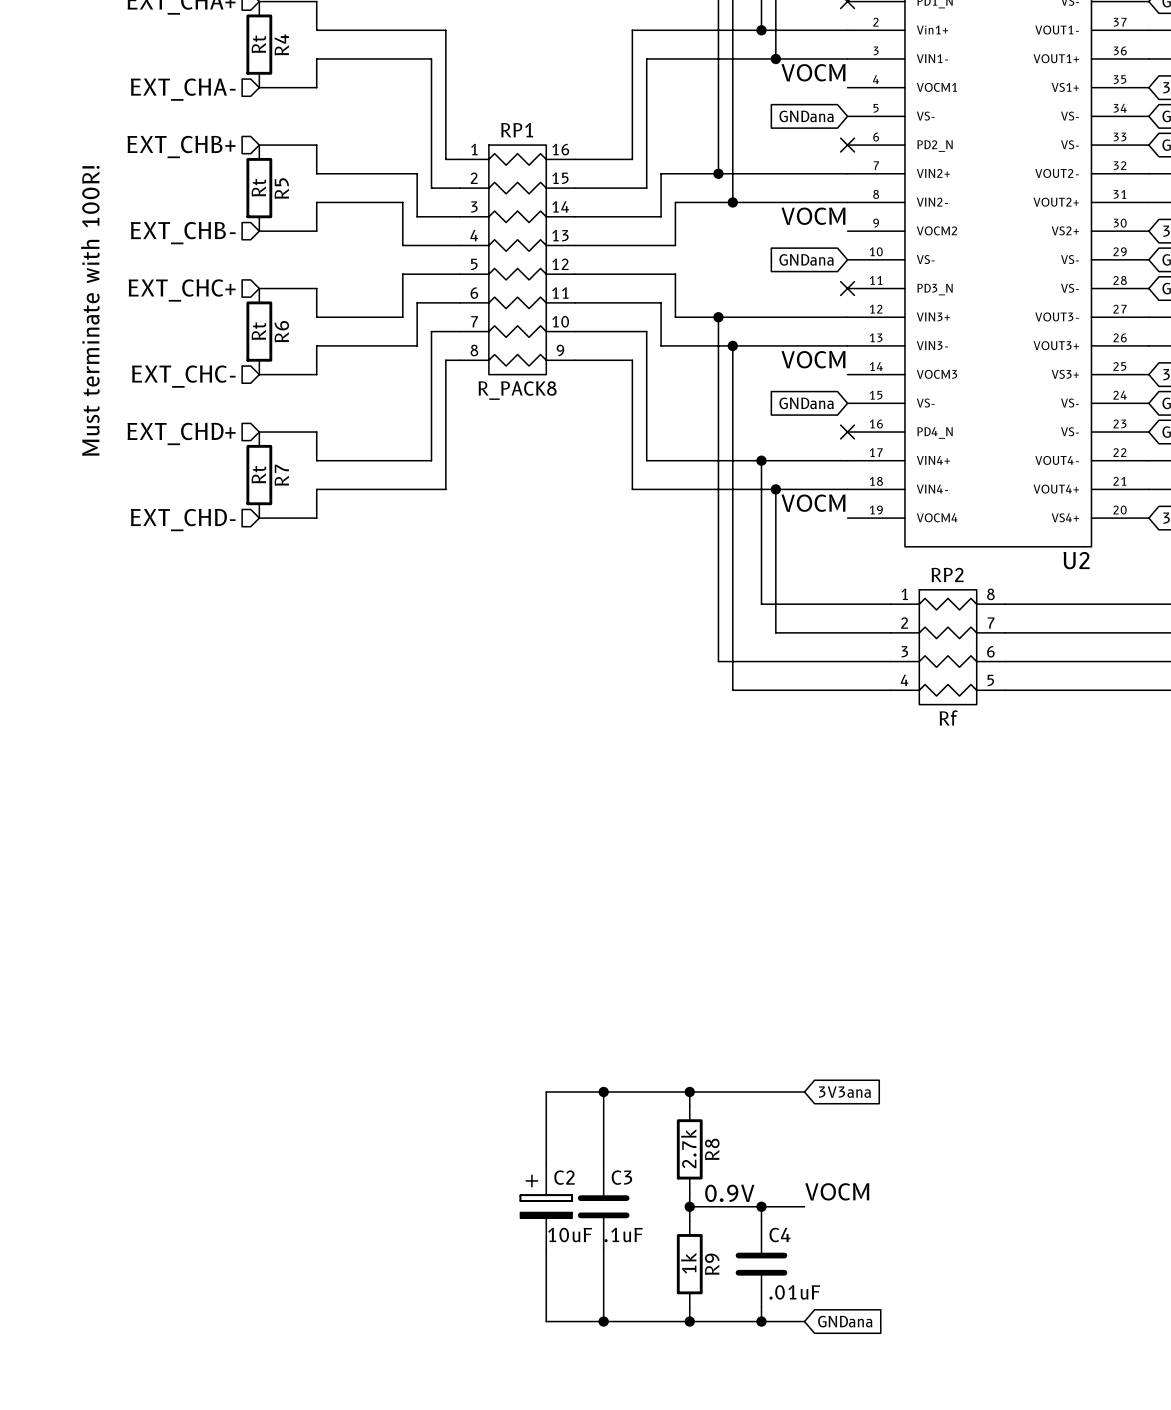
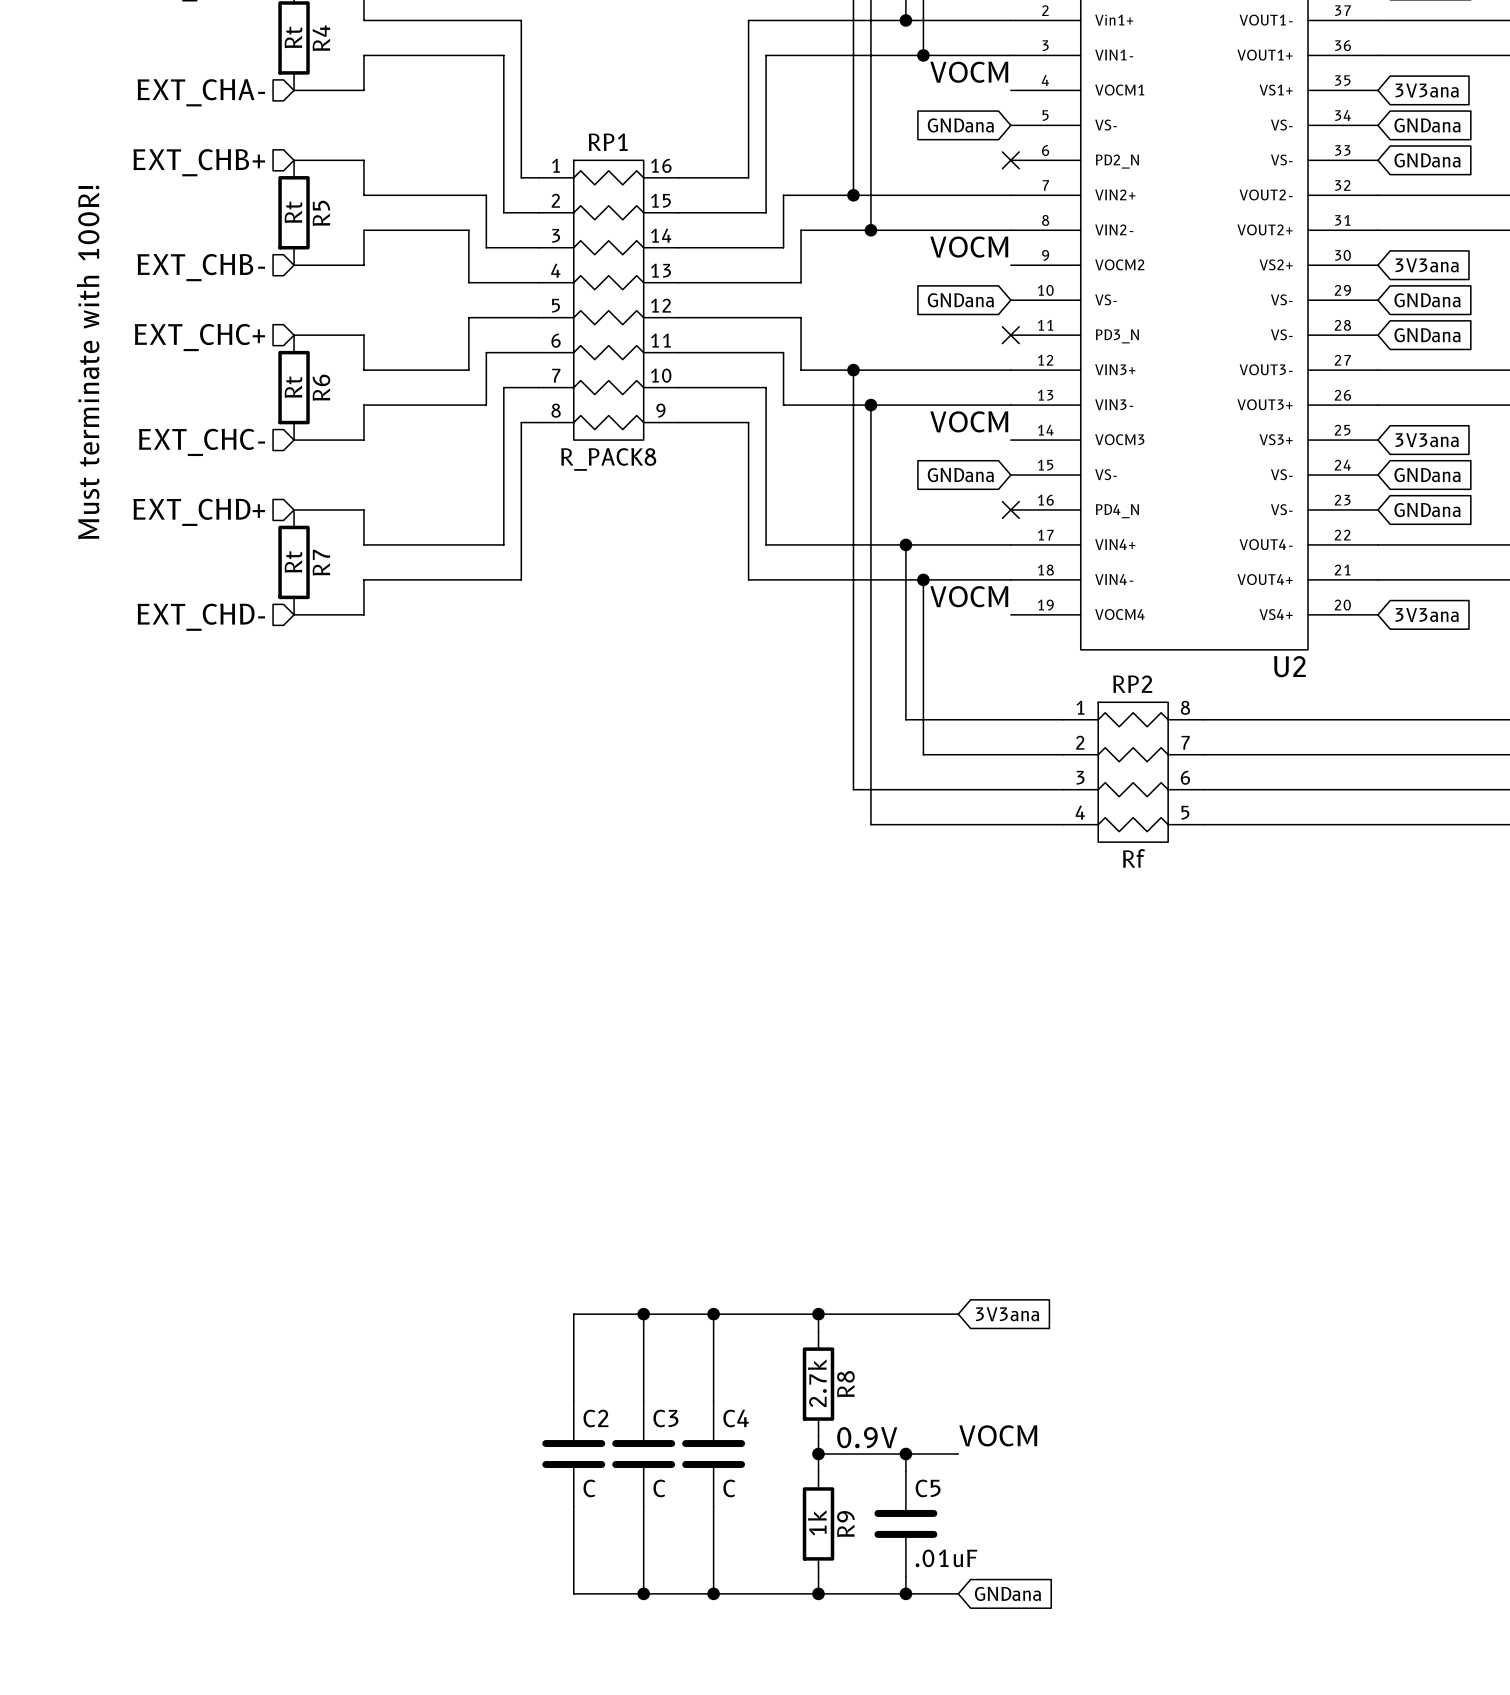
wire: none -> (643, 1314) (573, 1314) (573, 1401)
junction: none -> (643, 1314)
C2 symbol: [520, 1163, 573, 1250] -> [542, 1401, 606, 1507]
C3 name: C3 (621, 1177) -> C4 (736, 1418)
C3: none -> C (643, 1454)
C2 value: 10uF (570, 1235) -> C (589, 1488)
C3 value: .1uF (623, 1235) -> C (729, 1488)
C4 name: C4 (779, 1235) -> C5 (928, 1488)
wire: none -> (573, 1506) (573, 1593) (643, 1593)
junction: none -> (643, 1593)

